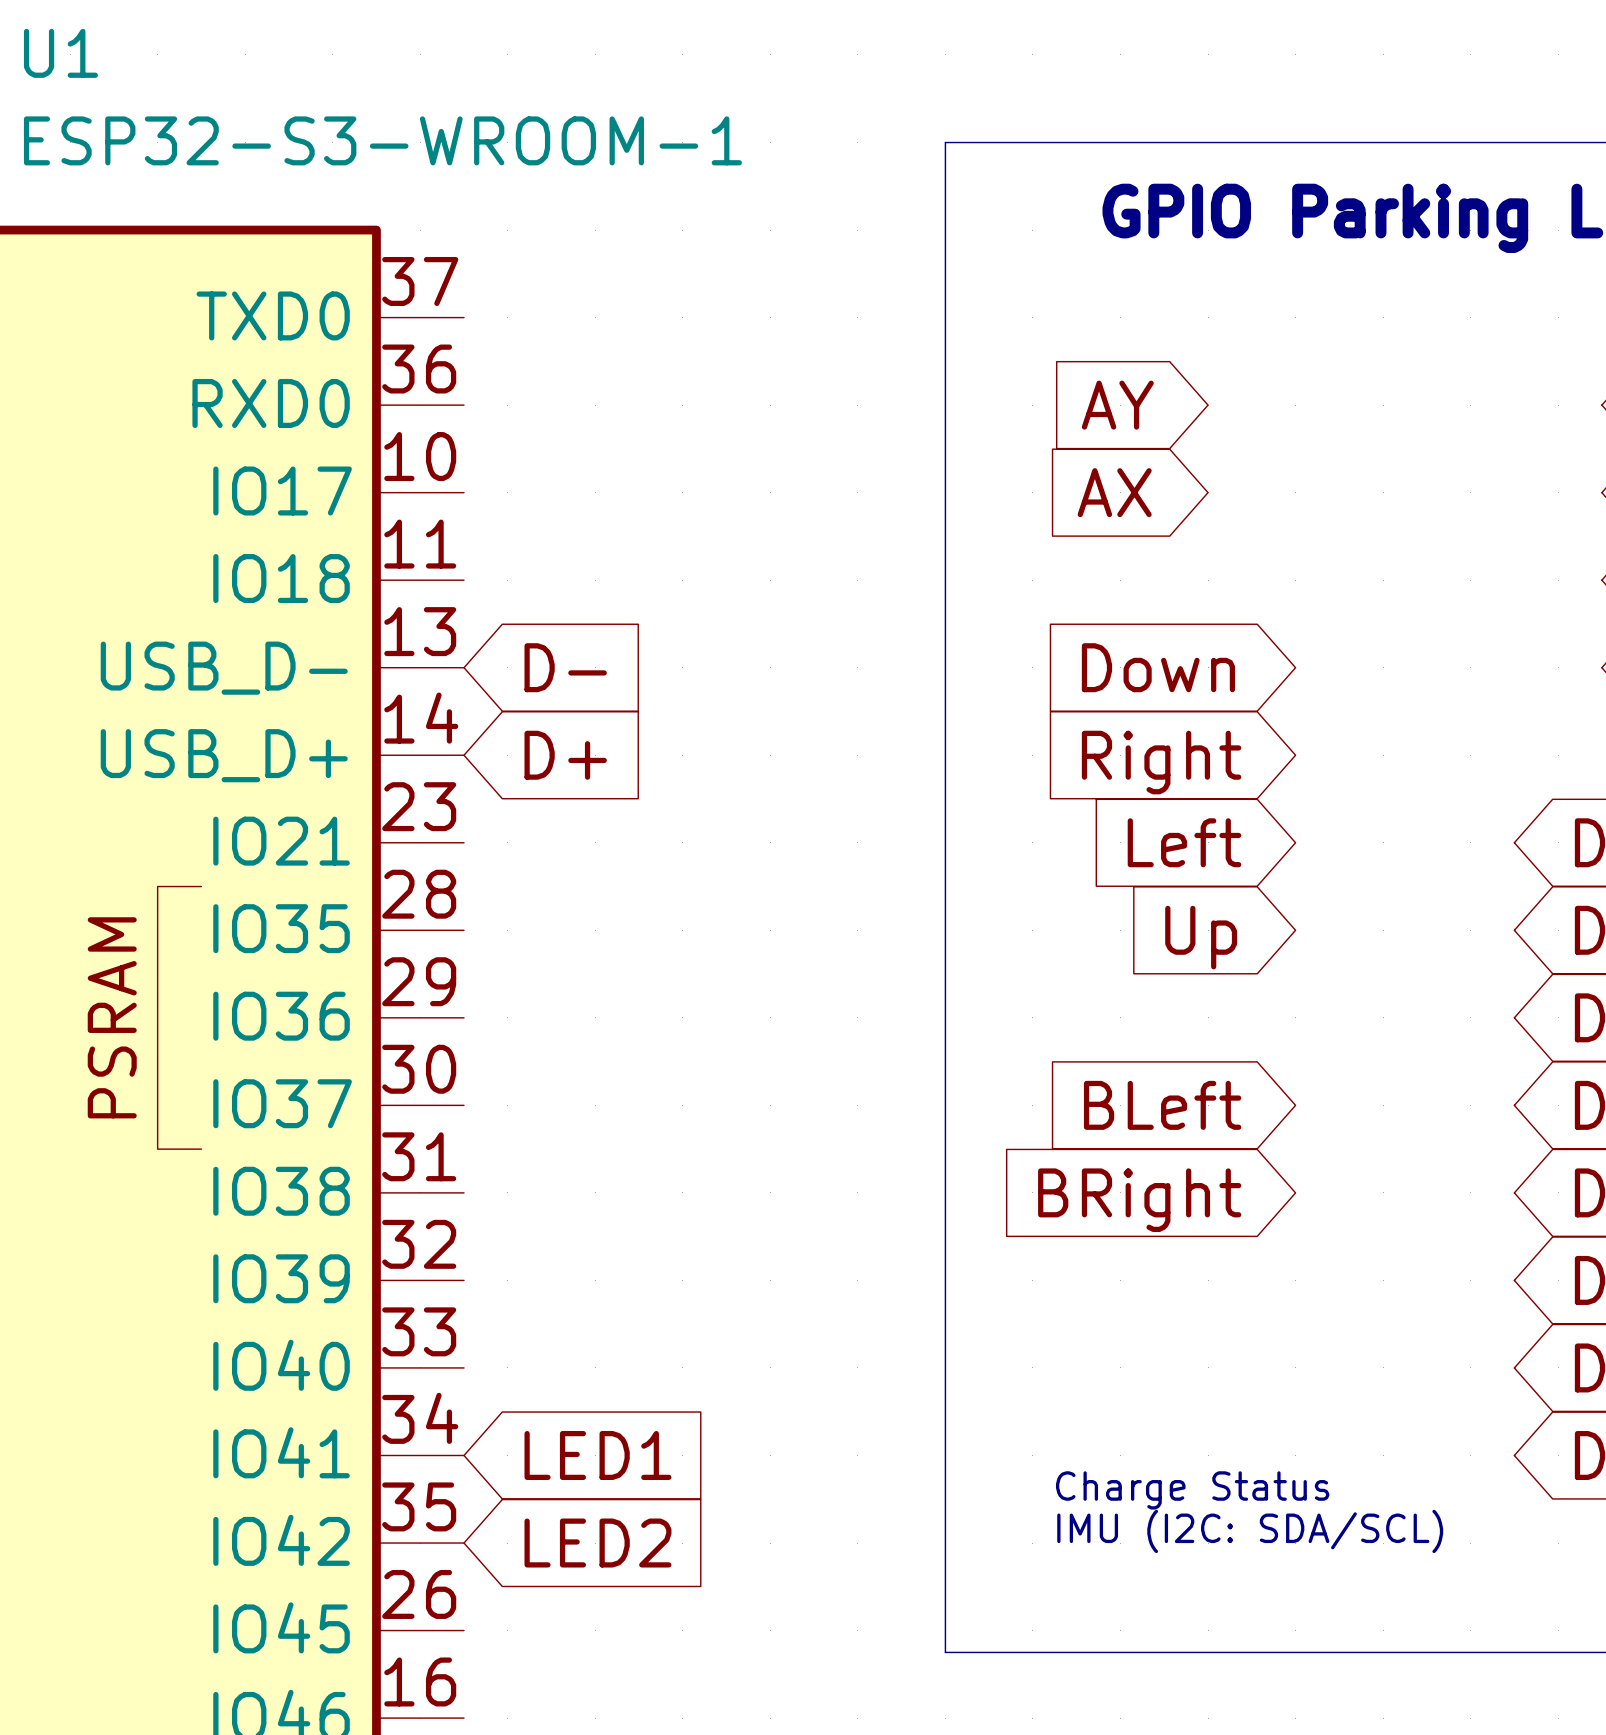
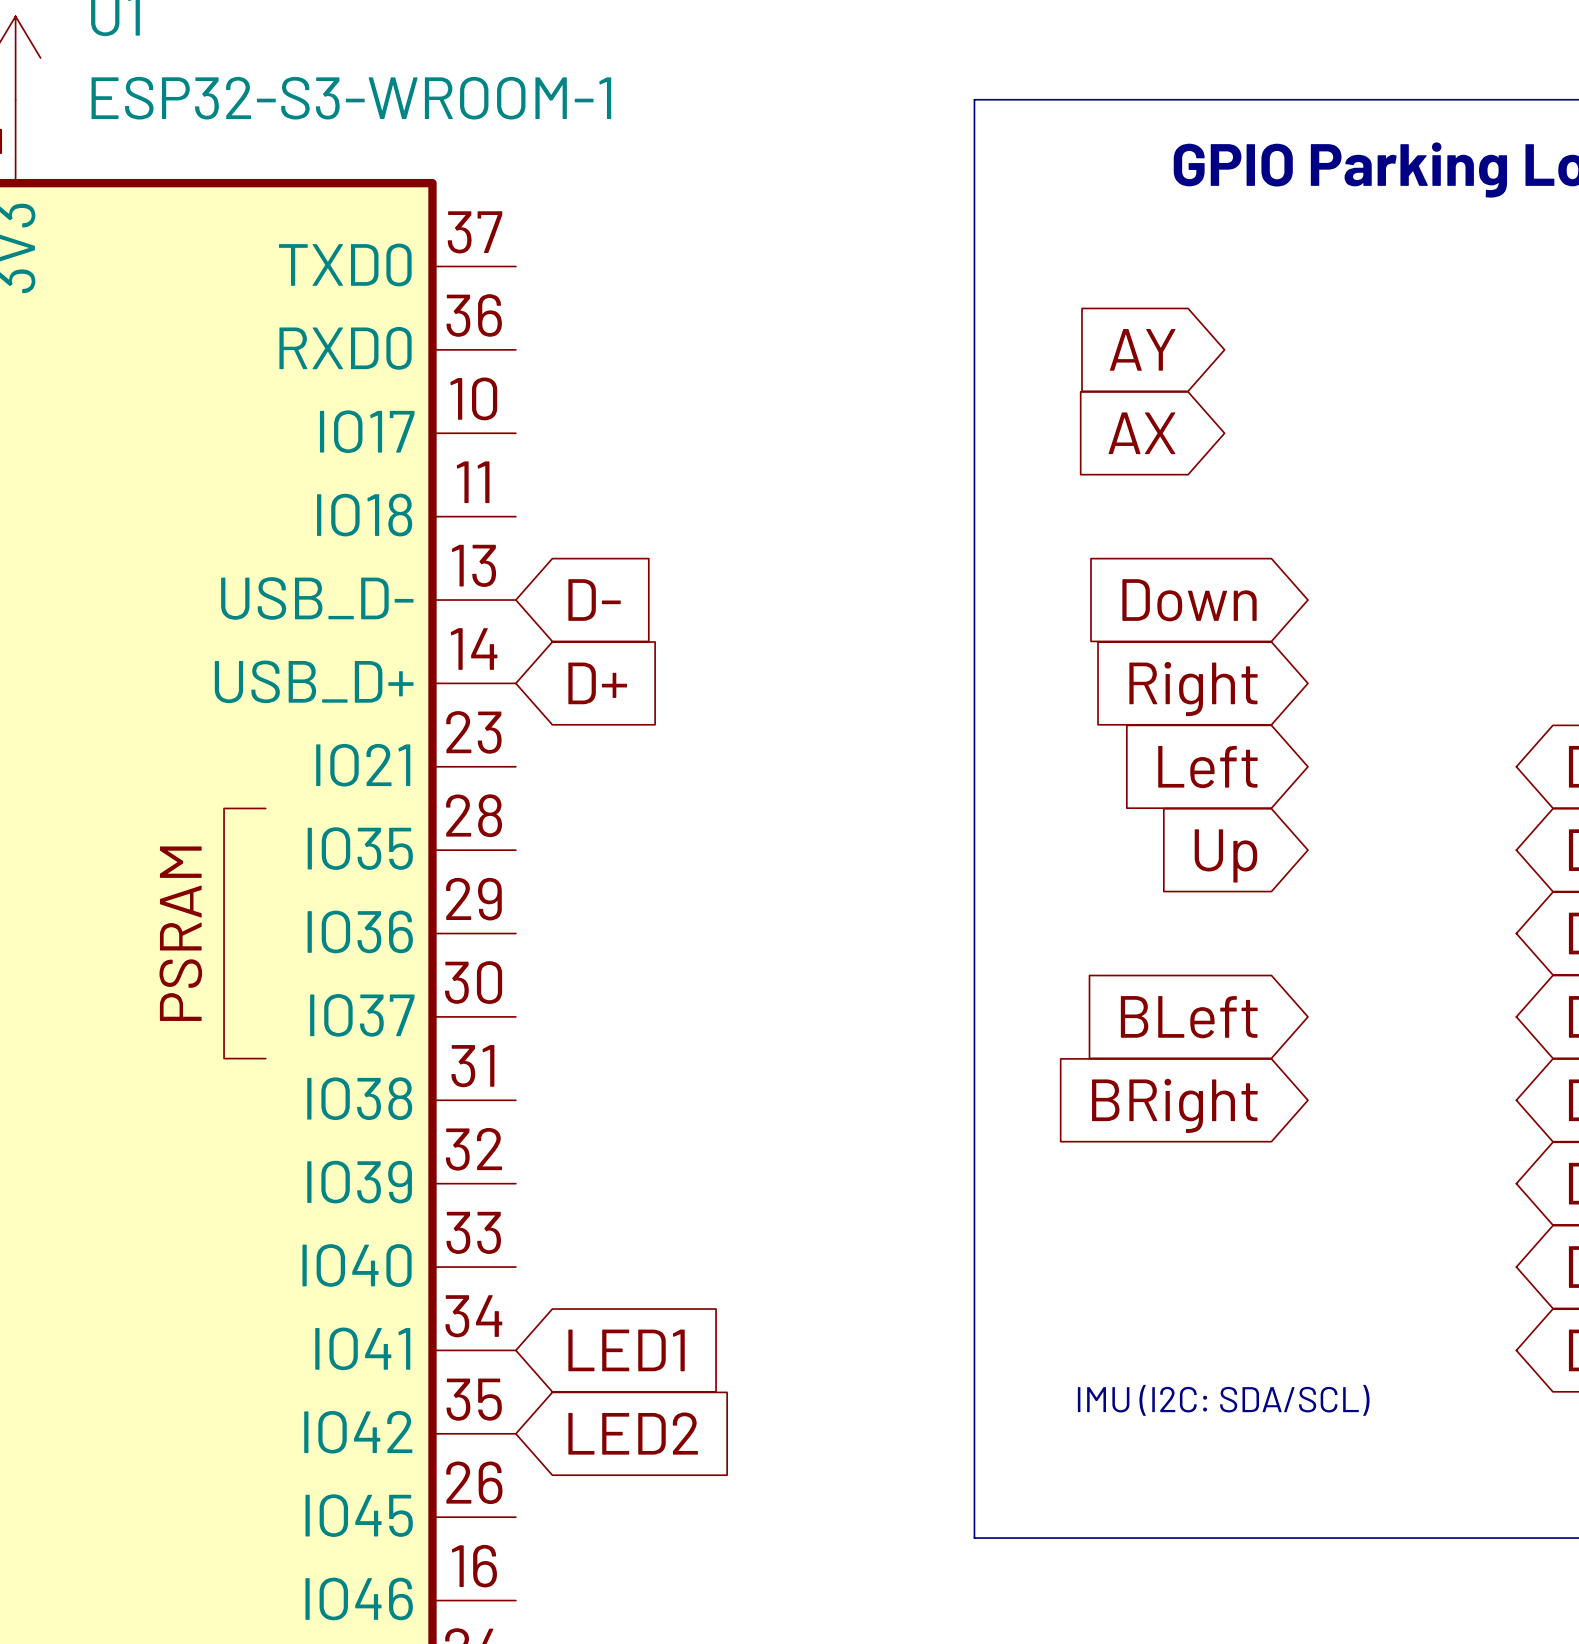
text: Charge Status (1192, 1490) -> none
text position: IMU (I2C: SDA/SCL) (1250, 1531) -> IMU (I2C: SDA/SCL) (1223, 1400)

